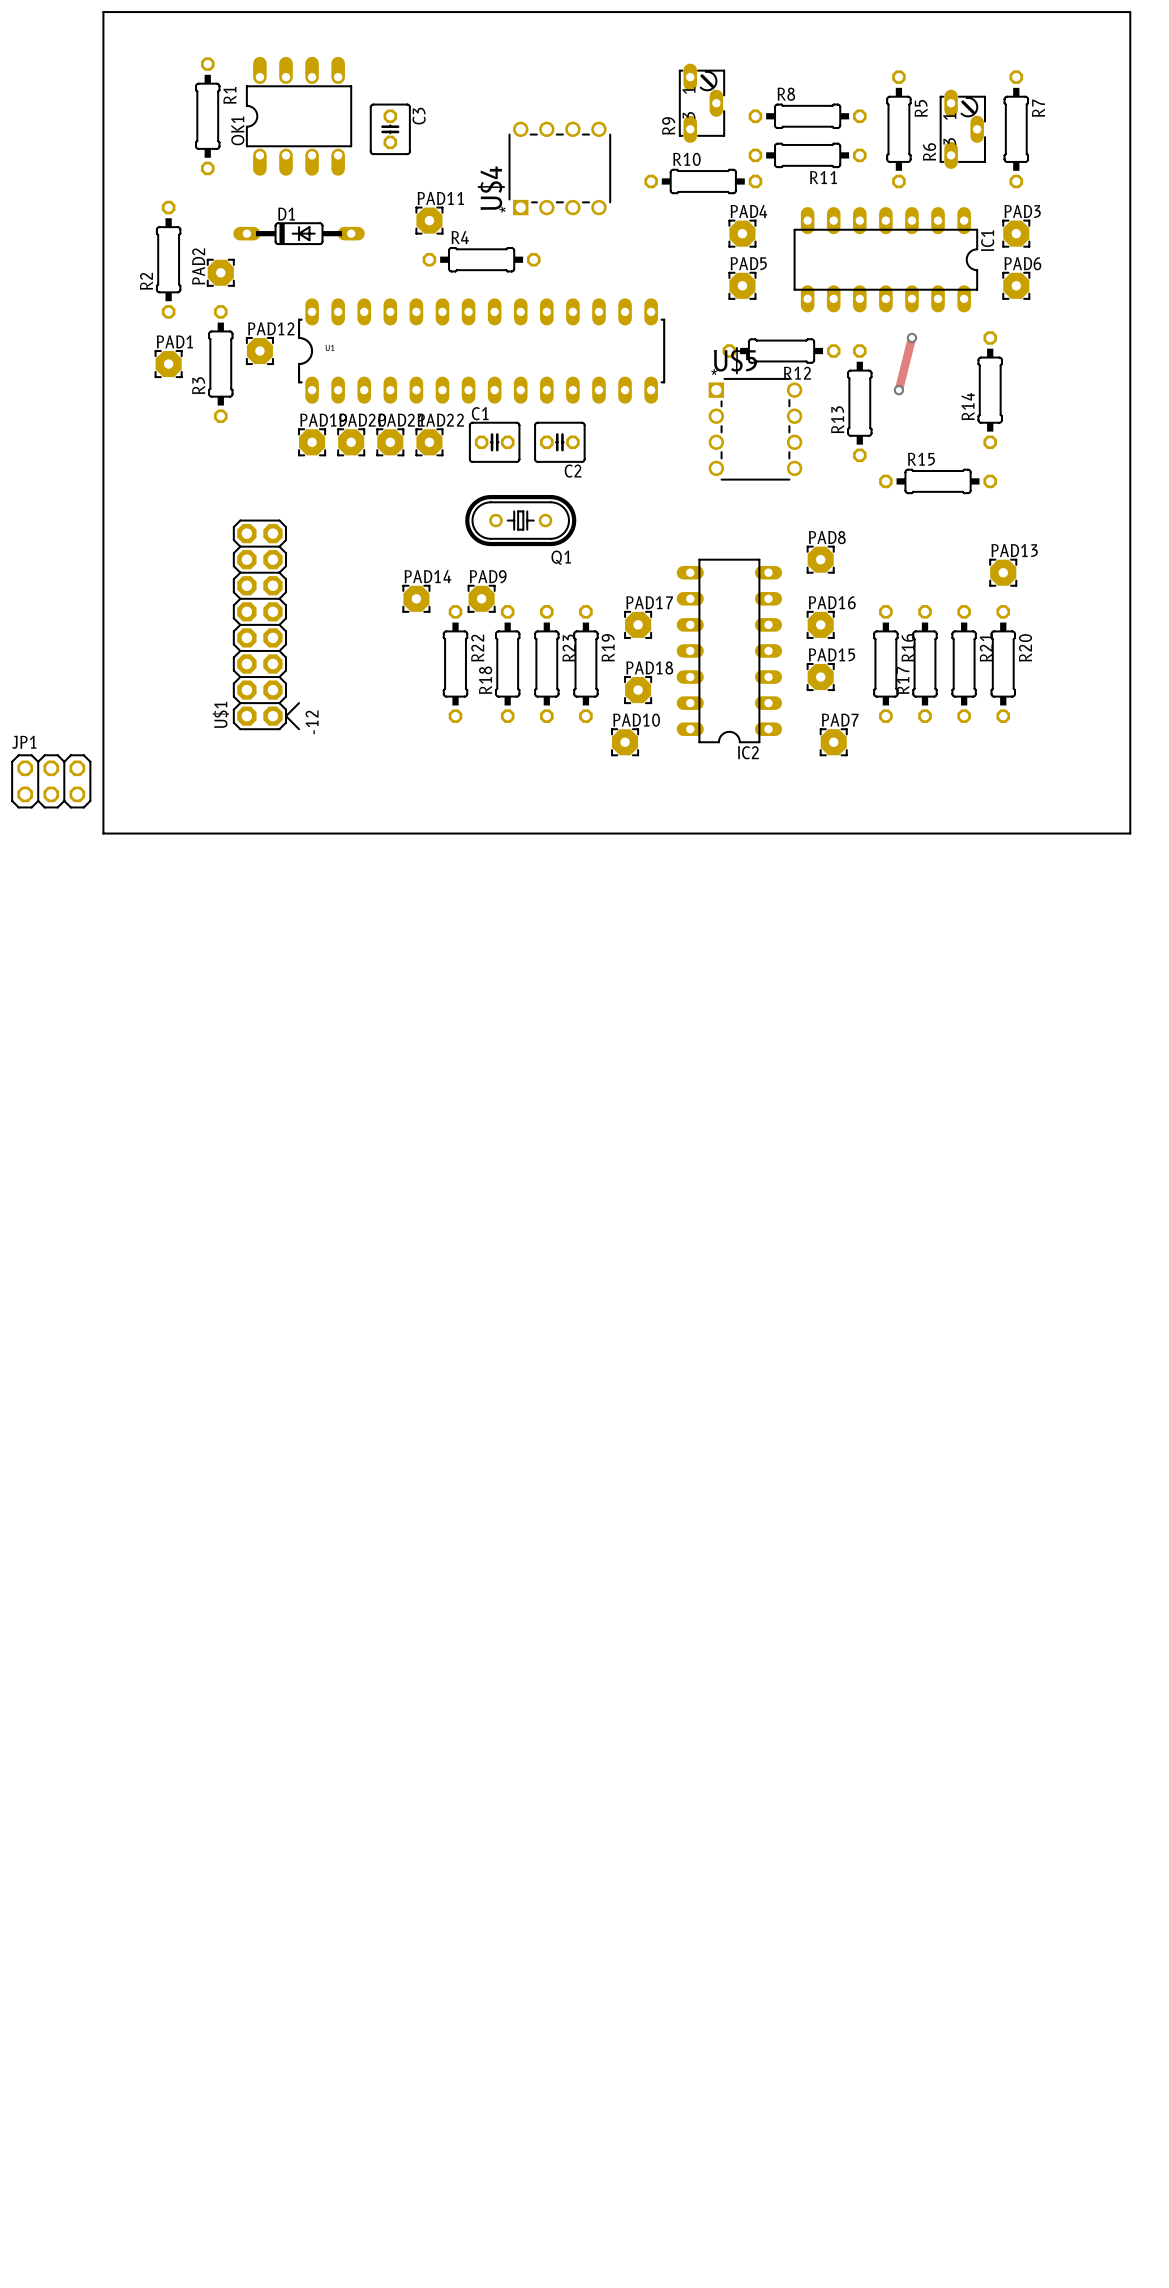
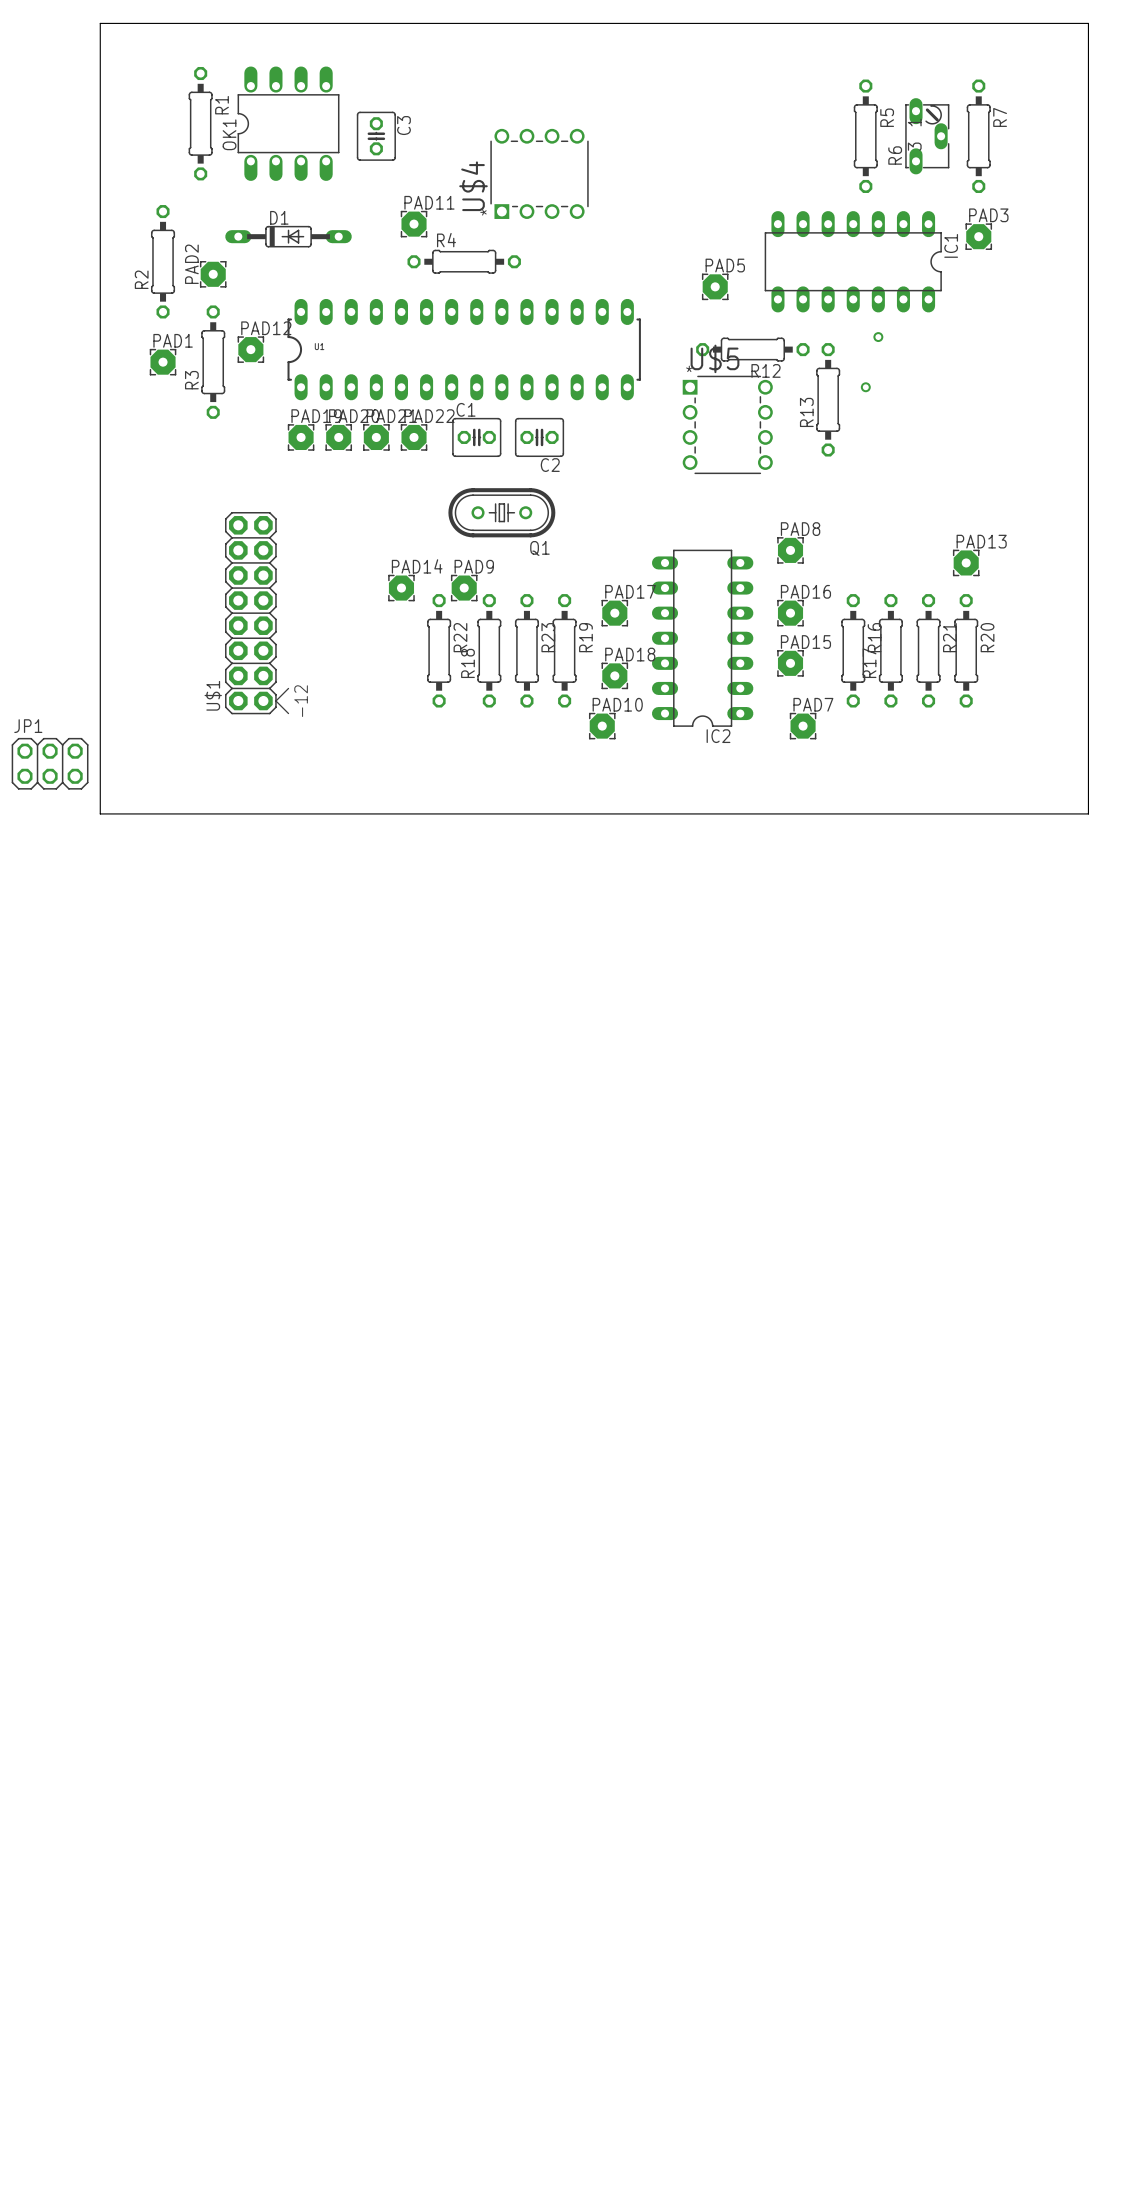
R9: (702, 103) -> none
R8: (807, 116) -> none
R11: (807, 155) -> none
R10: (703, 181) -> none
PAD4: (742, 233) -> none
PAD6: (1016, 285) -> none
track: (911, 337) (898, 390) -> none
R14: (990, 390) -> none
R15: (938, 481) -> none

